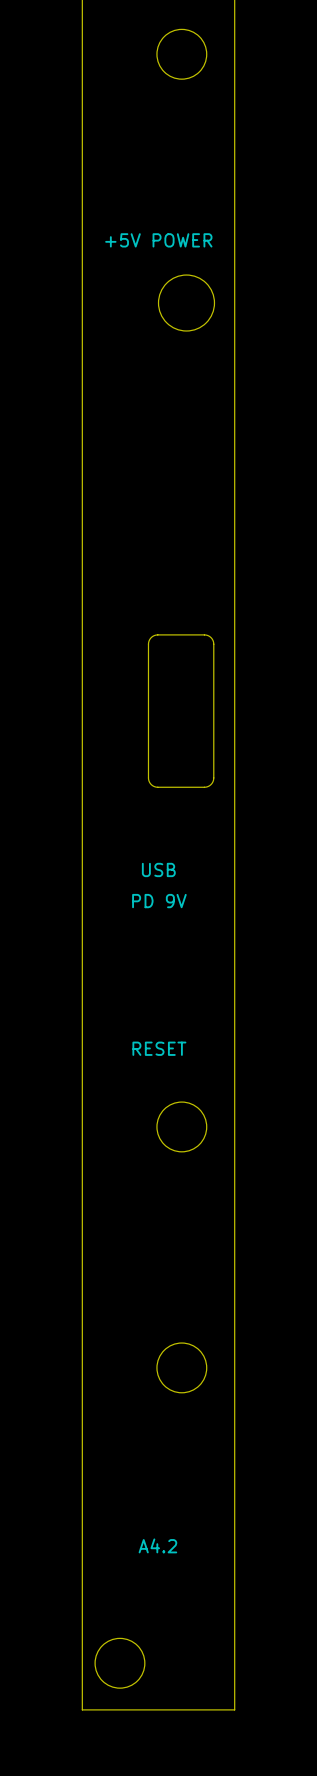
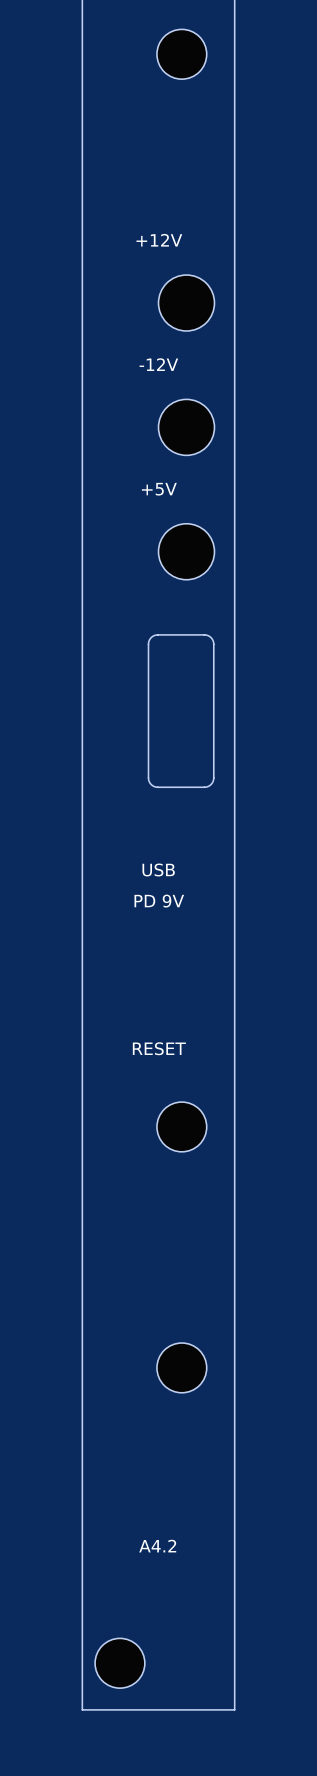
text: +5V POWER (158, 240) -> +12V (159, 240)
text: none -> -12V (158, 364)
part: none -> (186, 427)
text: none -> +5V (159, 489)
part: none -> (186, 551)

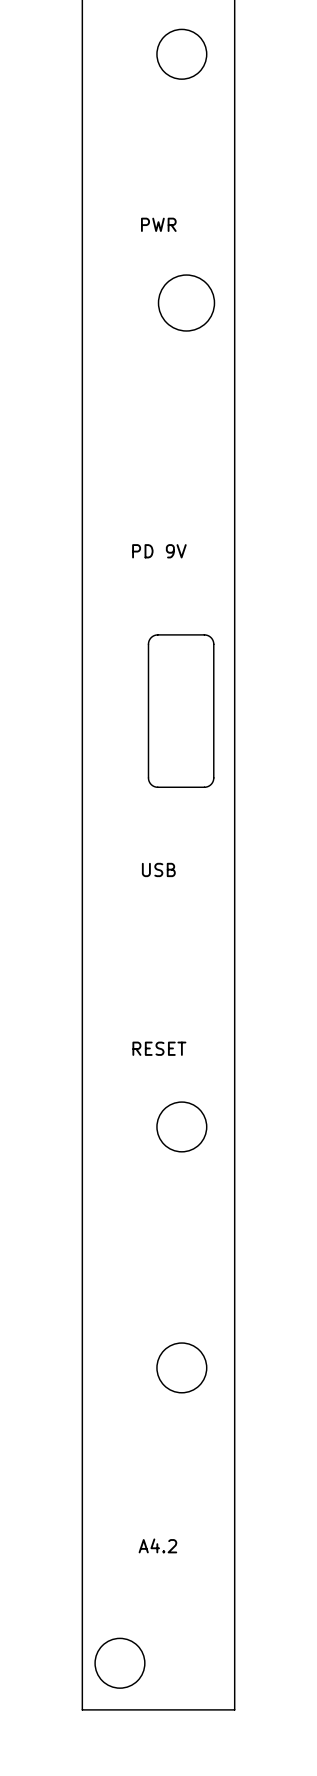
text: +12V (159, 240) -> PWR (158, 224)
text: -12V (158, 364) -> none
part: (186, 427) -> none
text: +5V (159, 489) -> none
part: (186, 551) -> none
text position: PD 9V (159, 901) -> PD 9V (159, 551)

